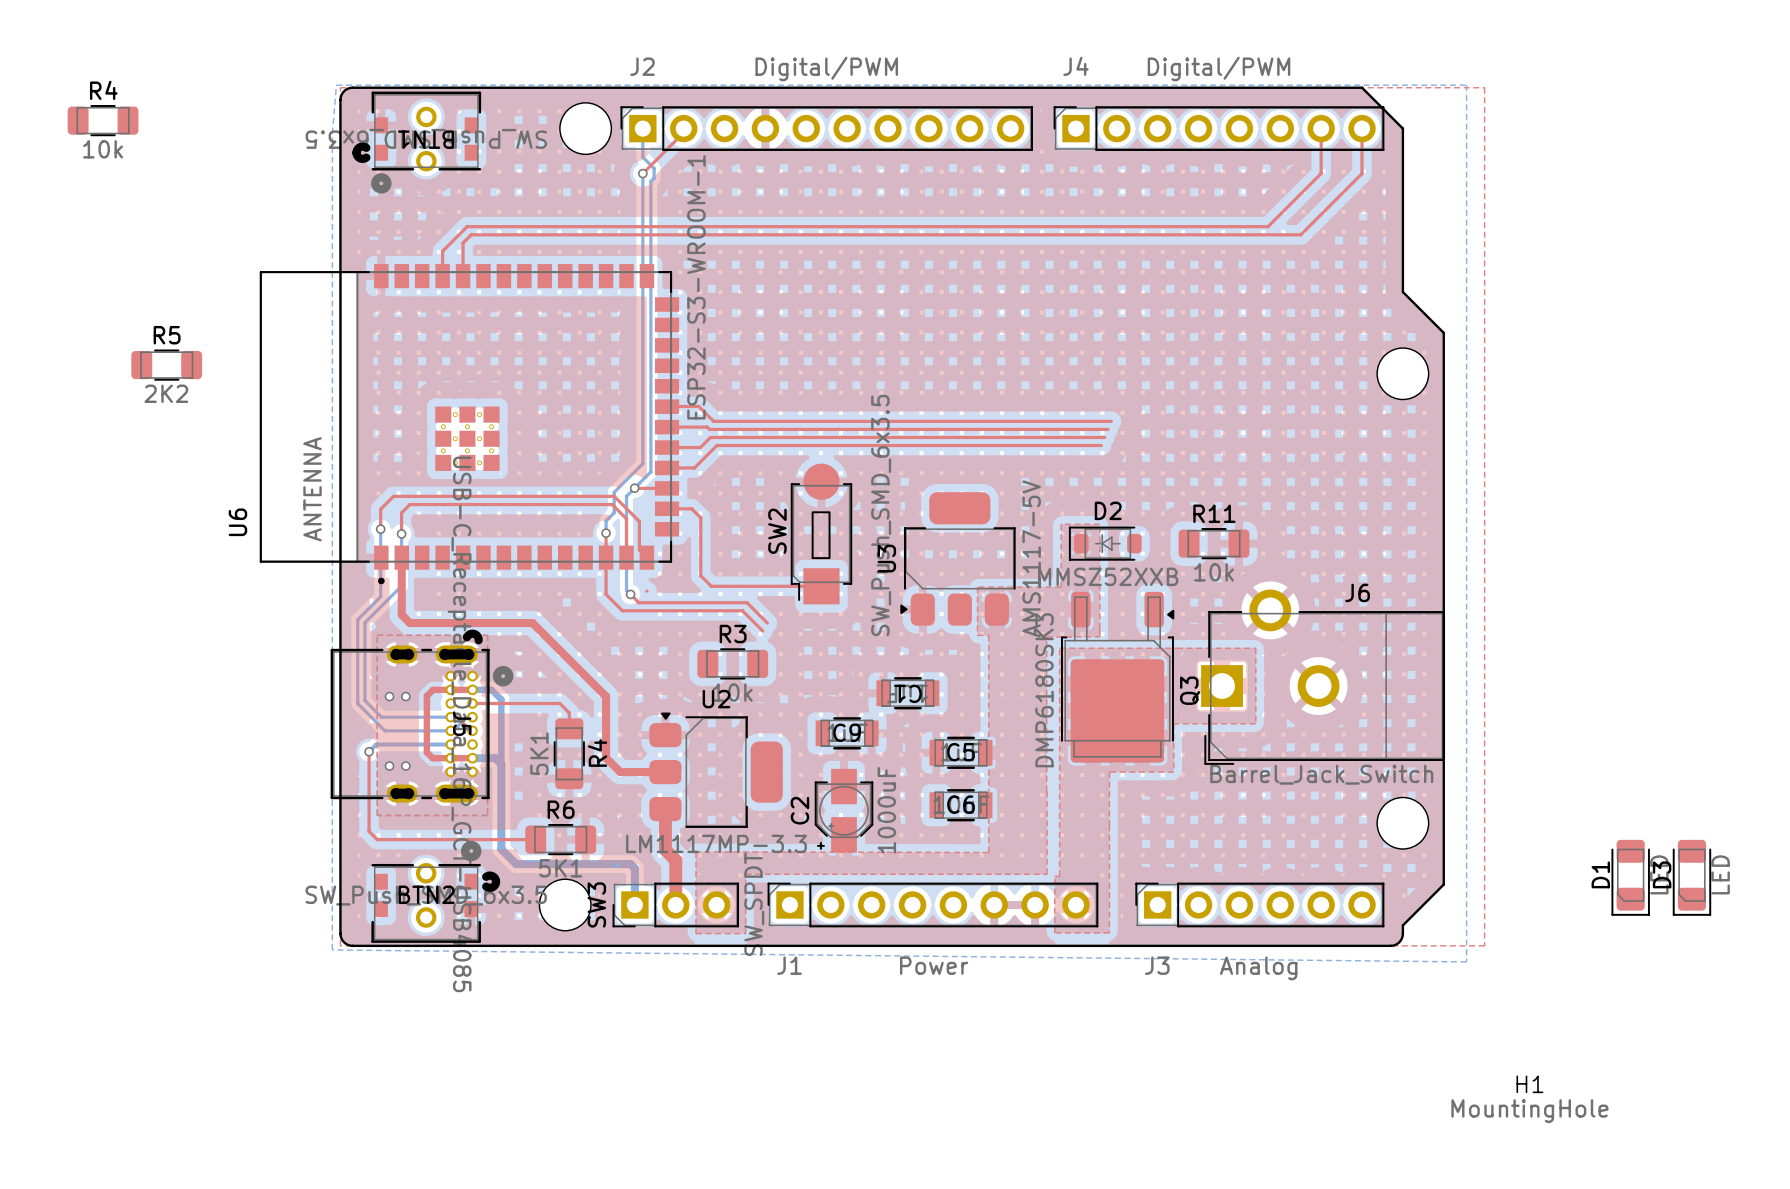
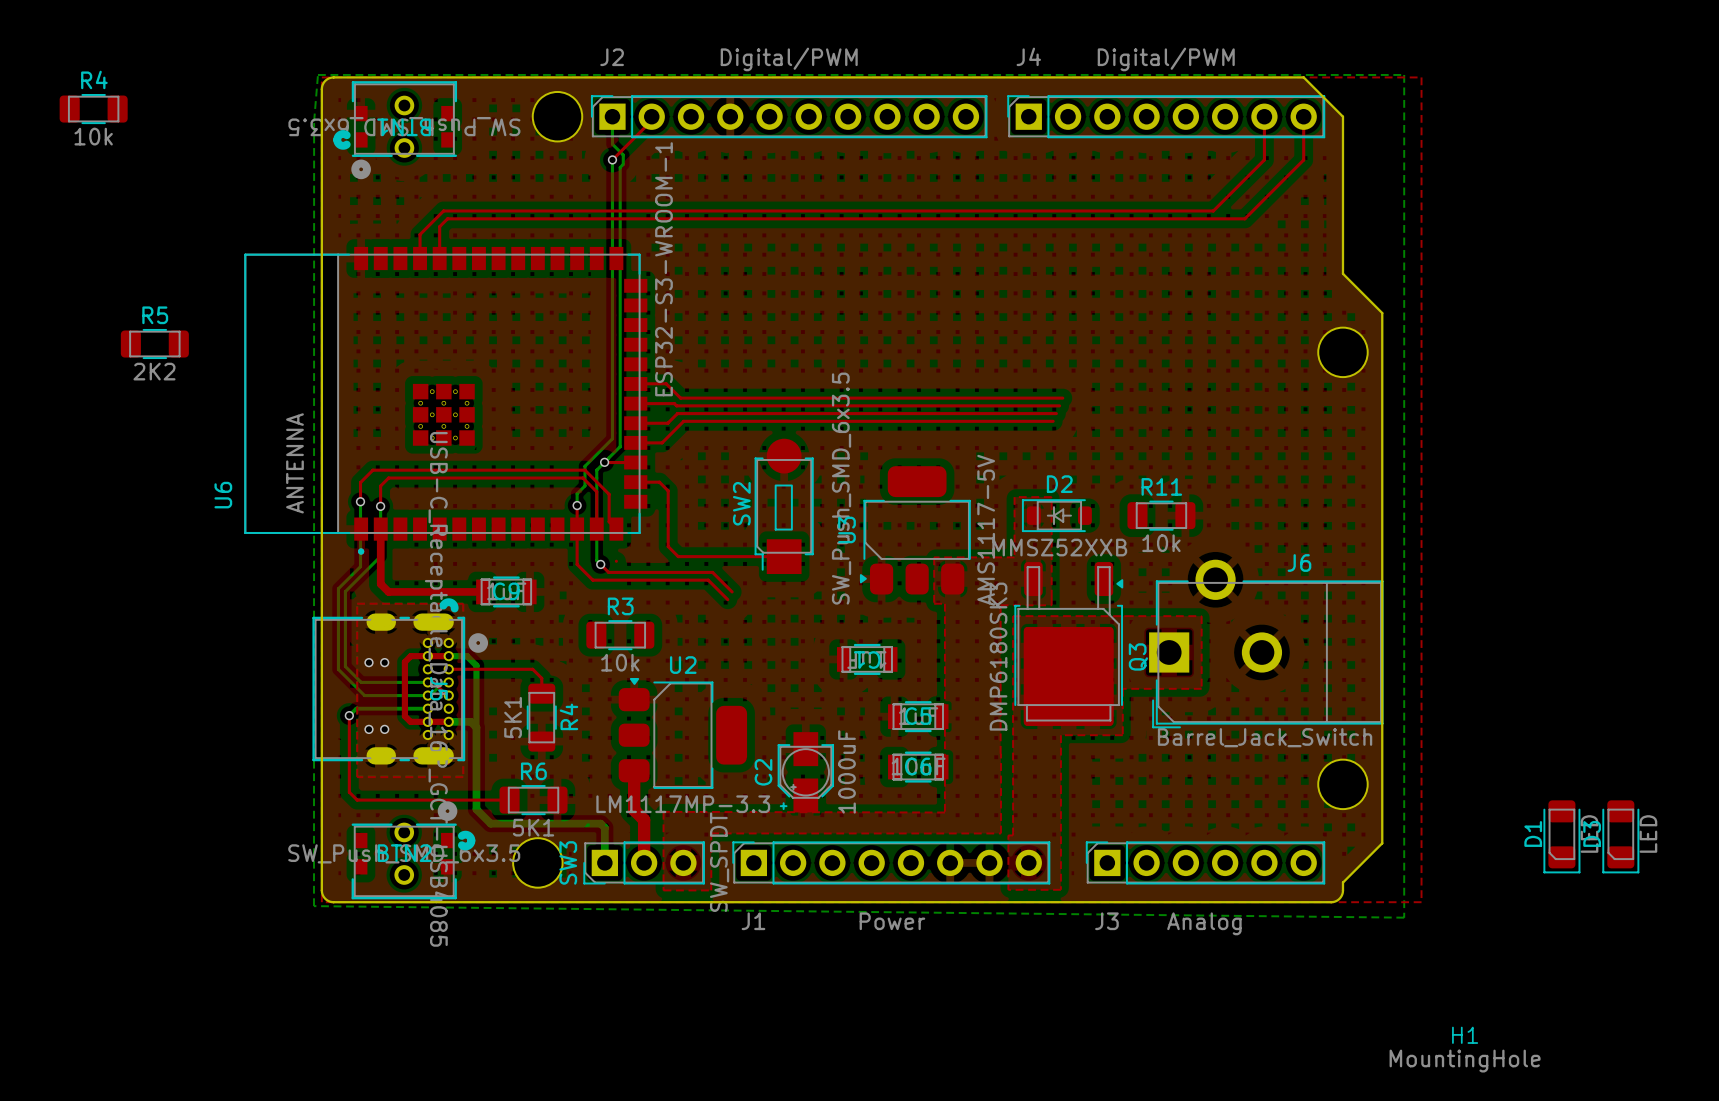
top track: (507, 623) (532, 623) (606, 696) (606, 757) (620, 772) (665, 772) -> none
R3 position: (732, 663) -> (620, 635)
C9 position: (847, 733) -> (506, 591)

